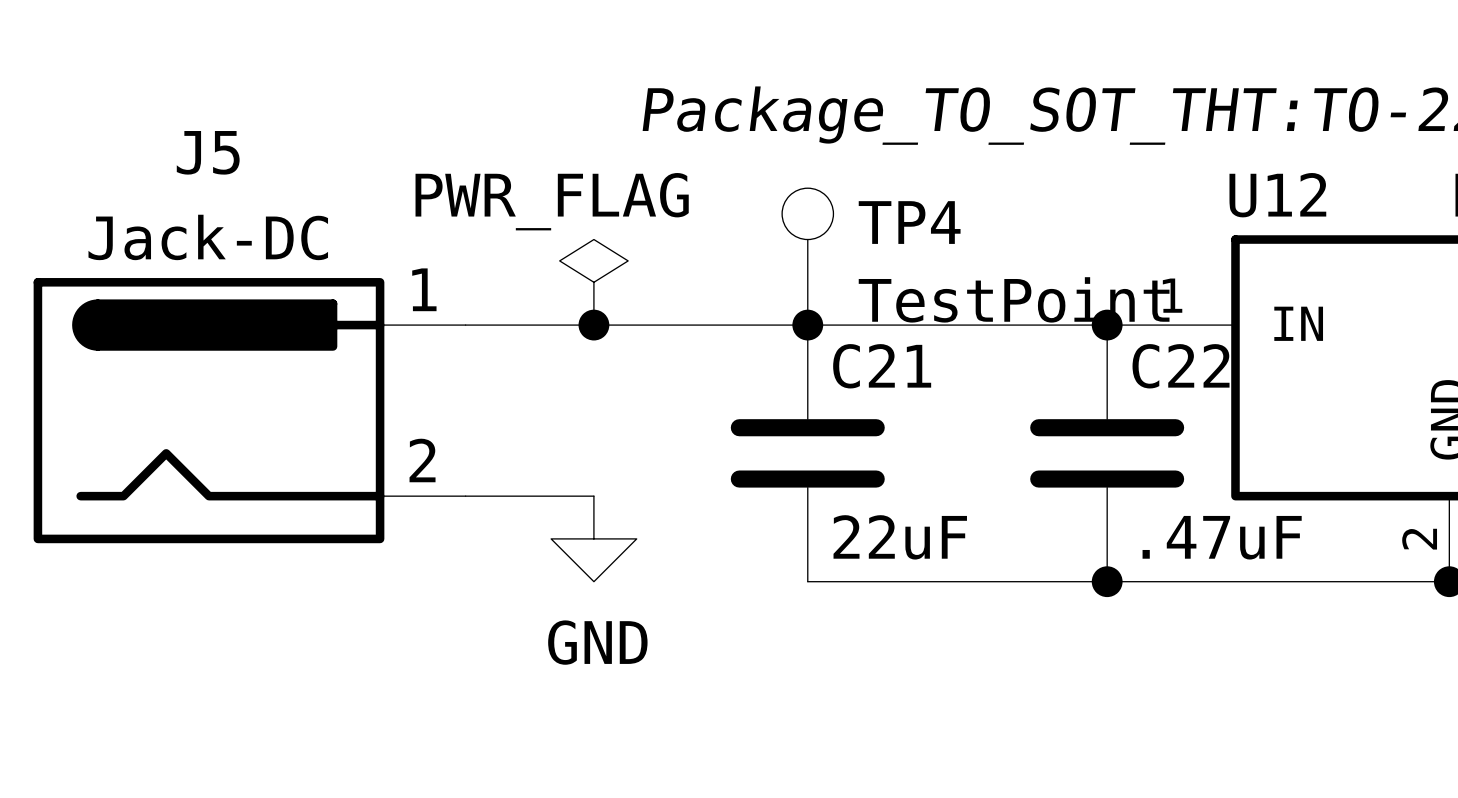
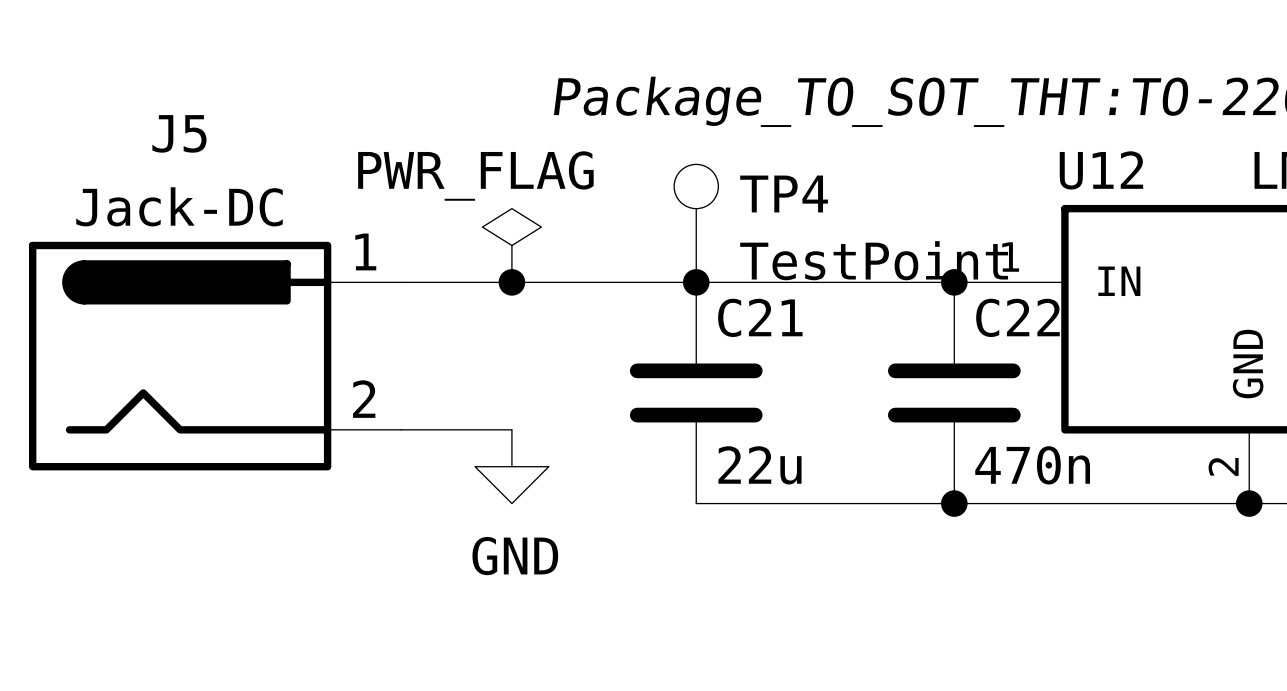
C21 value: 22uF (900, 537) -> 22u (759, 465)
C22 value: .47uF (1222, 537) -> 470n (1032, 465)

